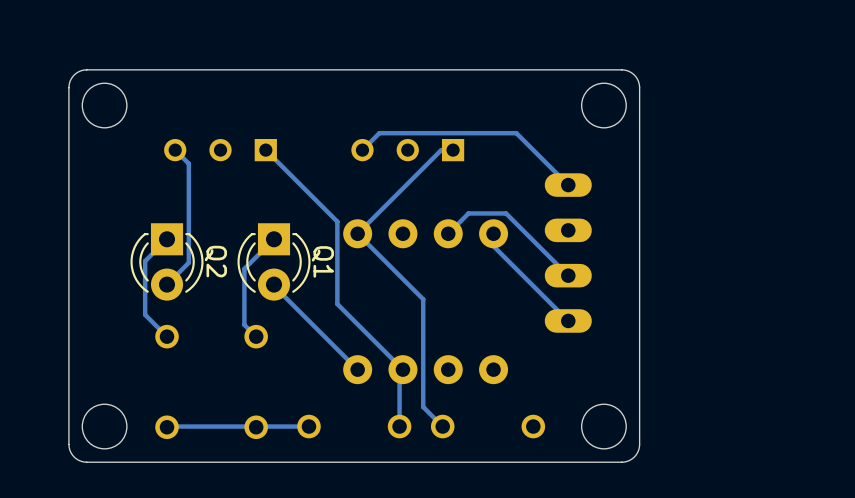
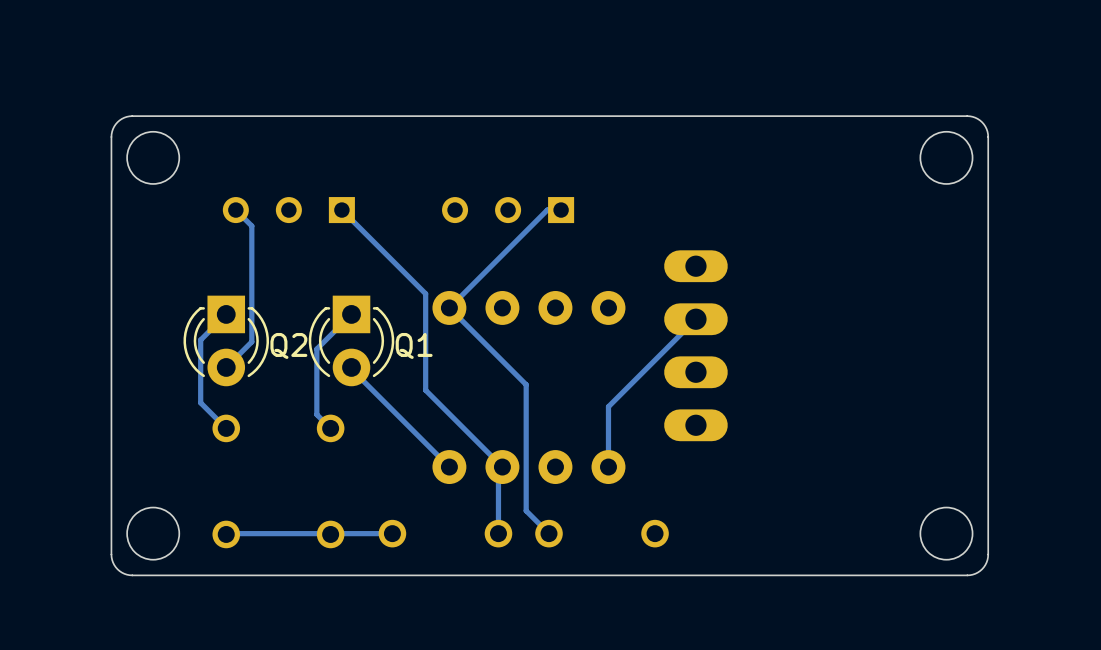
board edge: (621, 69) (634, 75) (639, 87) (639, 444) (634, 456) (621, 462) -> (758, 116) (970, 116) (982, 122) (986, 129) (988, 136) (988, 554) (985, 564) (977, 572) (967, 575) (758, 575)
round board edge position: (603, 105) -> (946, 157)
track: (362, 150) (379, 133) (516, 133) (568, 185) -> none
part footprint: [544, 173, 592, 333] -> [664, 250, 728, 442]
track: (448, 233) (468, 213) (506, 213) (568, 275) -> none
track: (493, 233) (493, 246) (568, 320) -> none
track: none -> (695, 319) (608, 406) (608, 467)
Q2 name rotation: 0° (215, 261) -> 90° counterclockwise (288, 345)
Q1 name rotation: 0° (322, 261) -> 90° counterclockwise (414, 345)
round board edge position: (603, 426) -> (946, 533)

